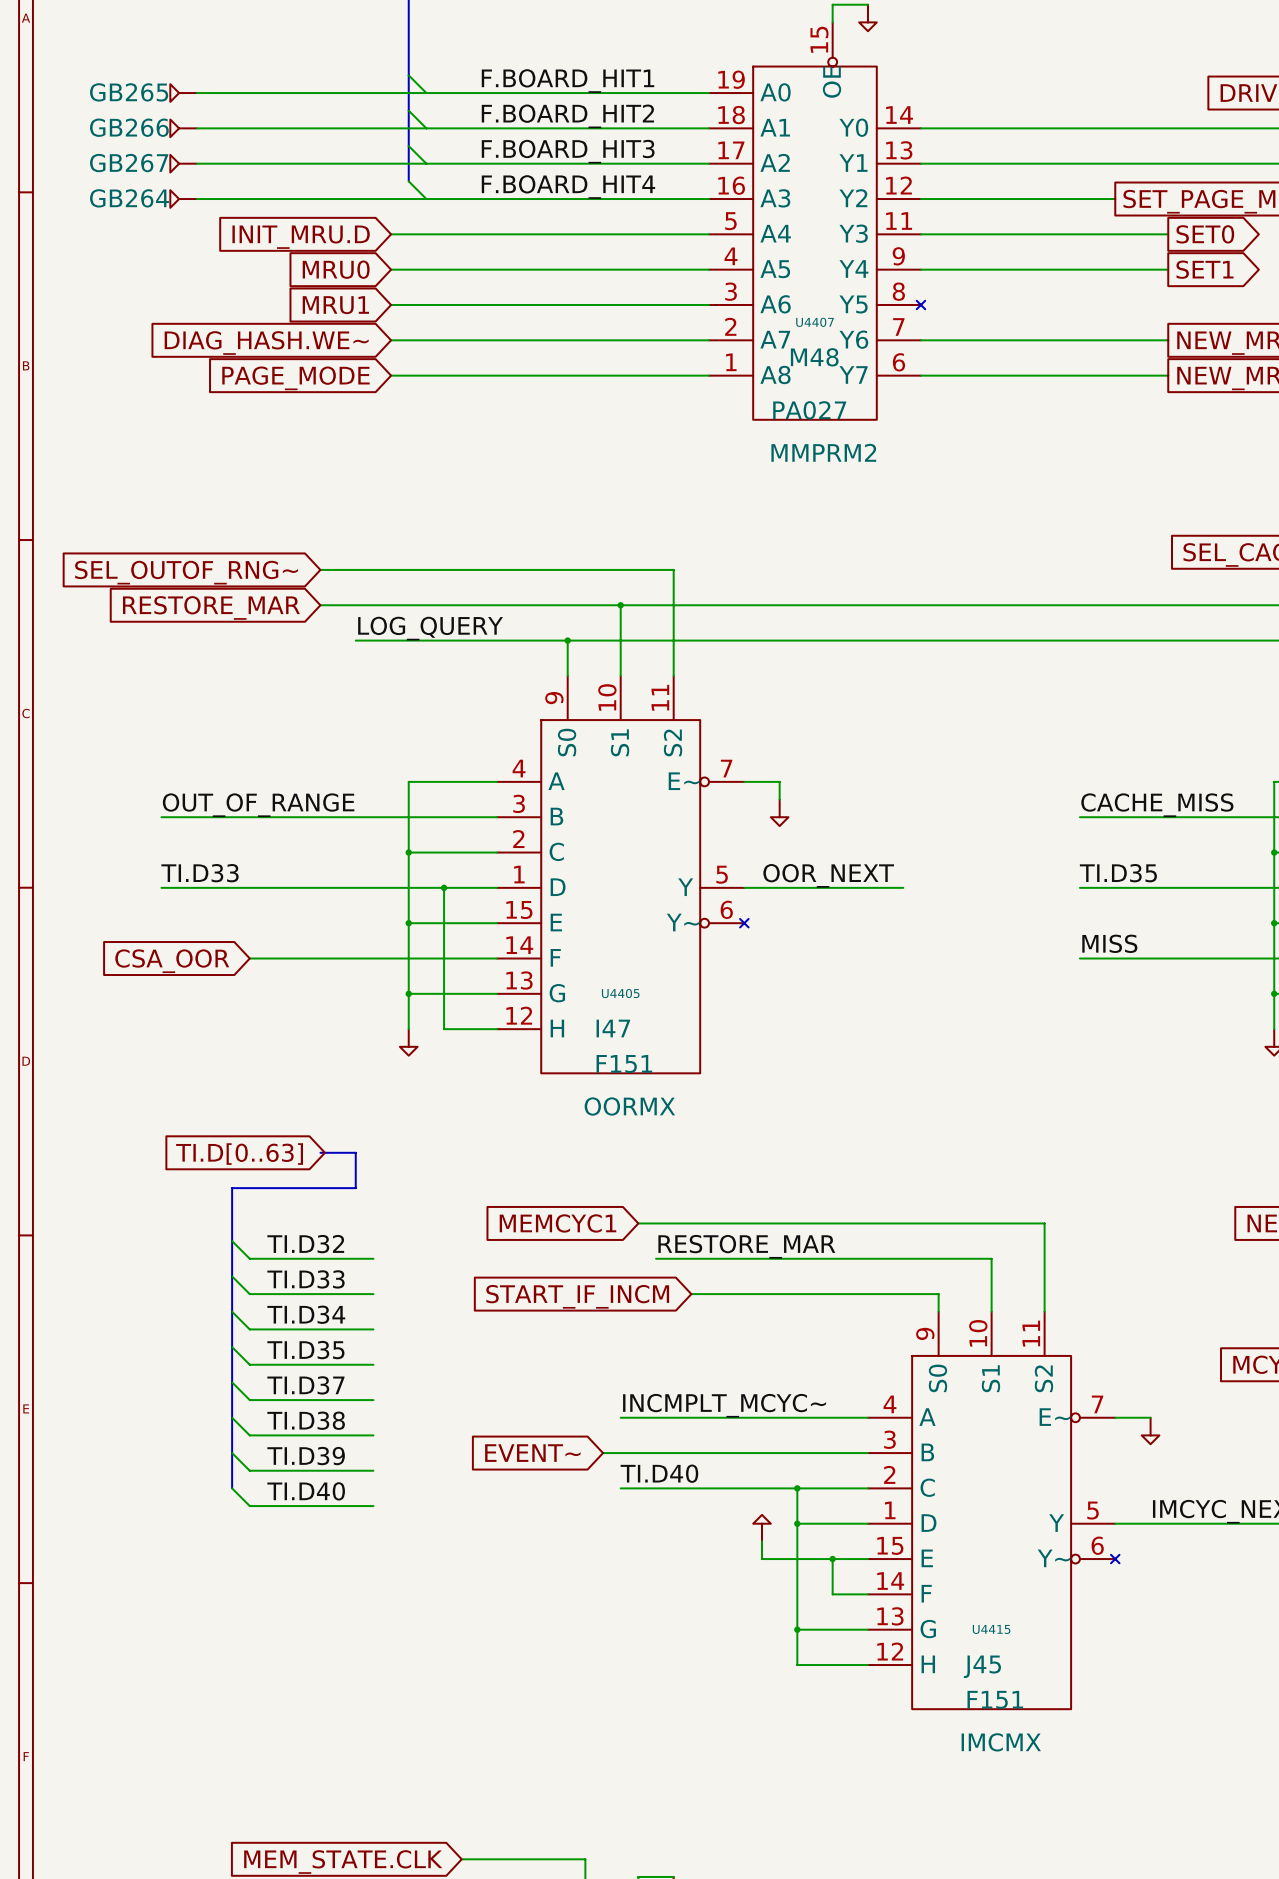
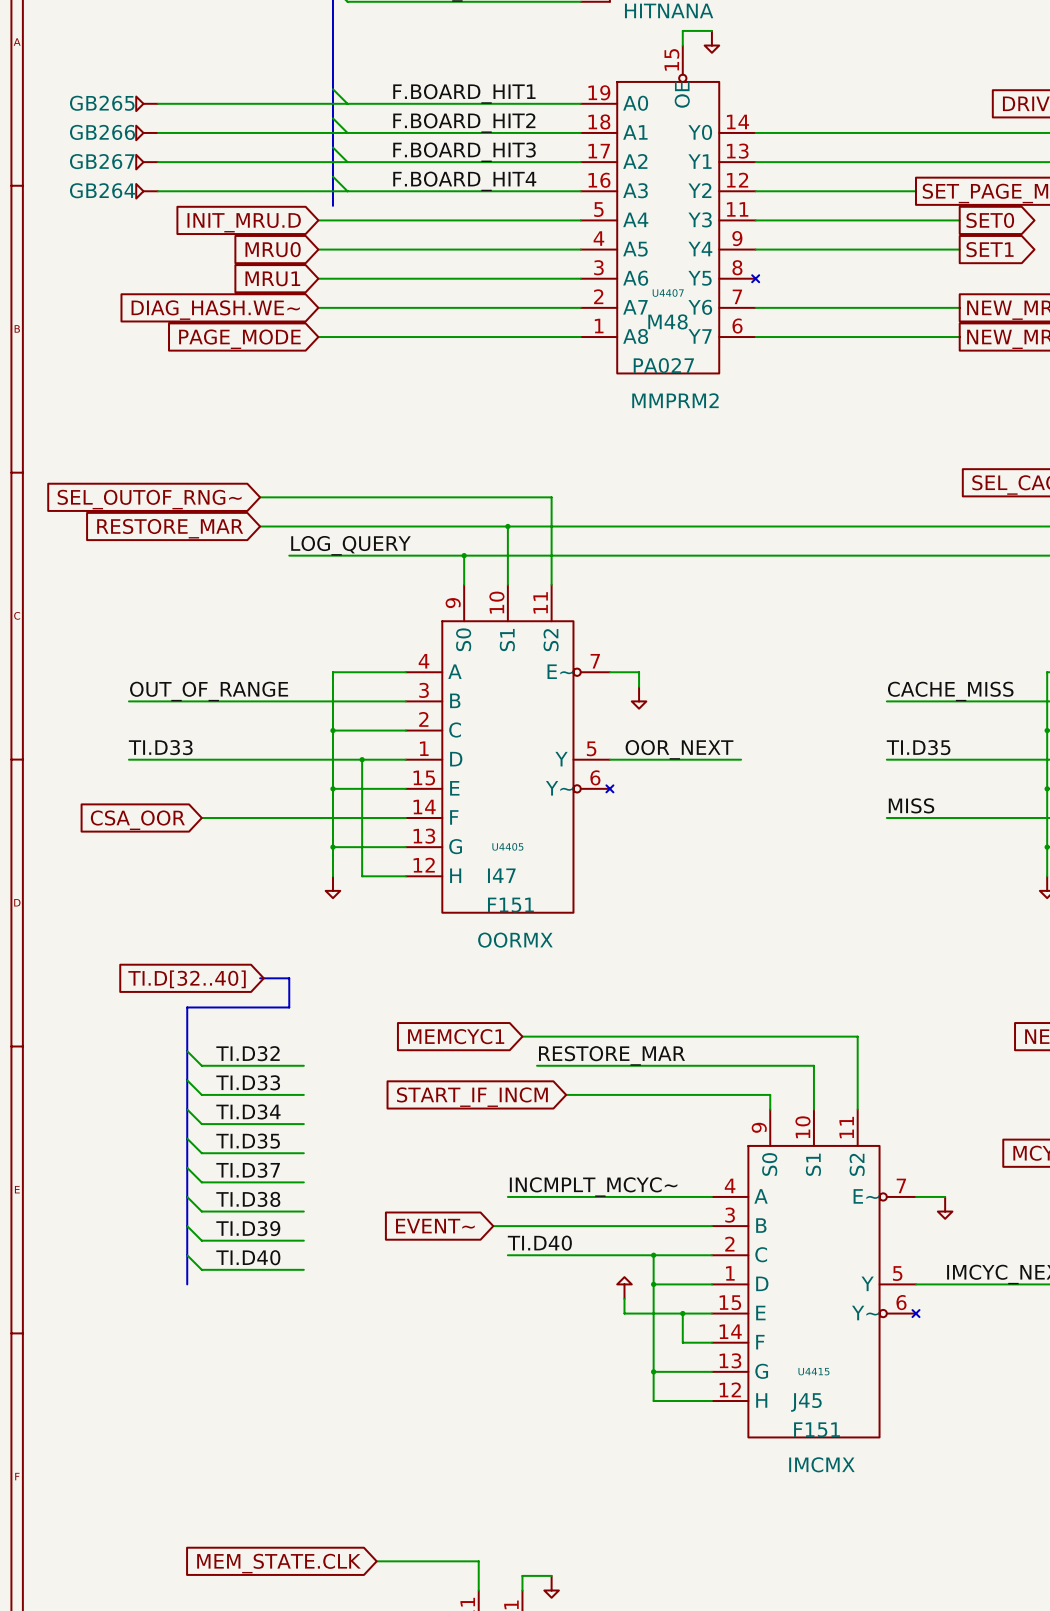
bus: none -> (332, 176) (332, 205)
global label: TI.D[0..63] (239, 1154) -> TI.D[32..40] (187, 979)
bus: none -> (187, 1255) (187, 1284)

